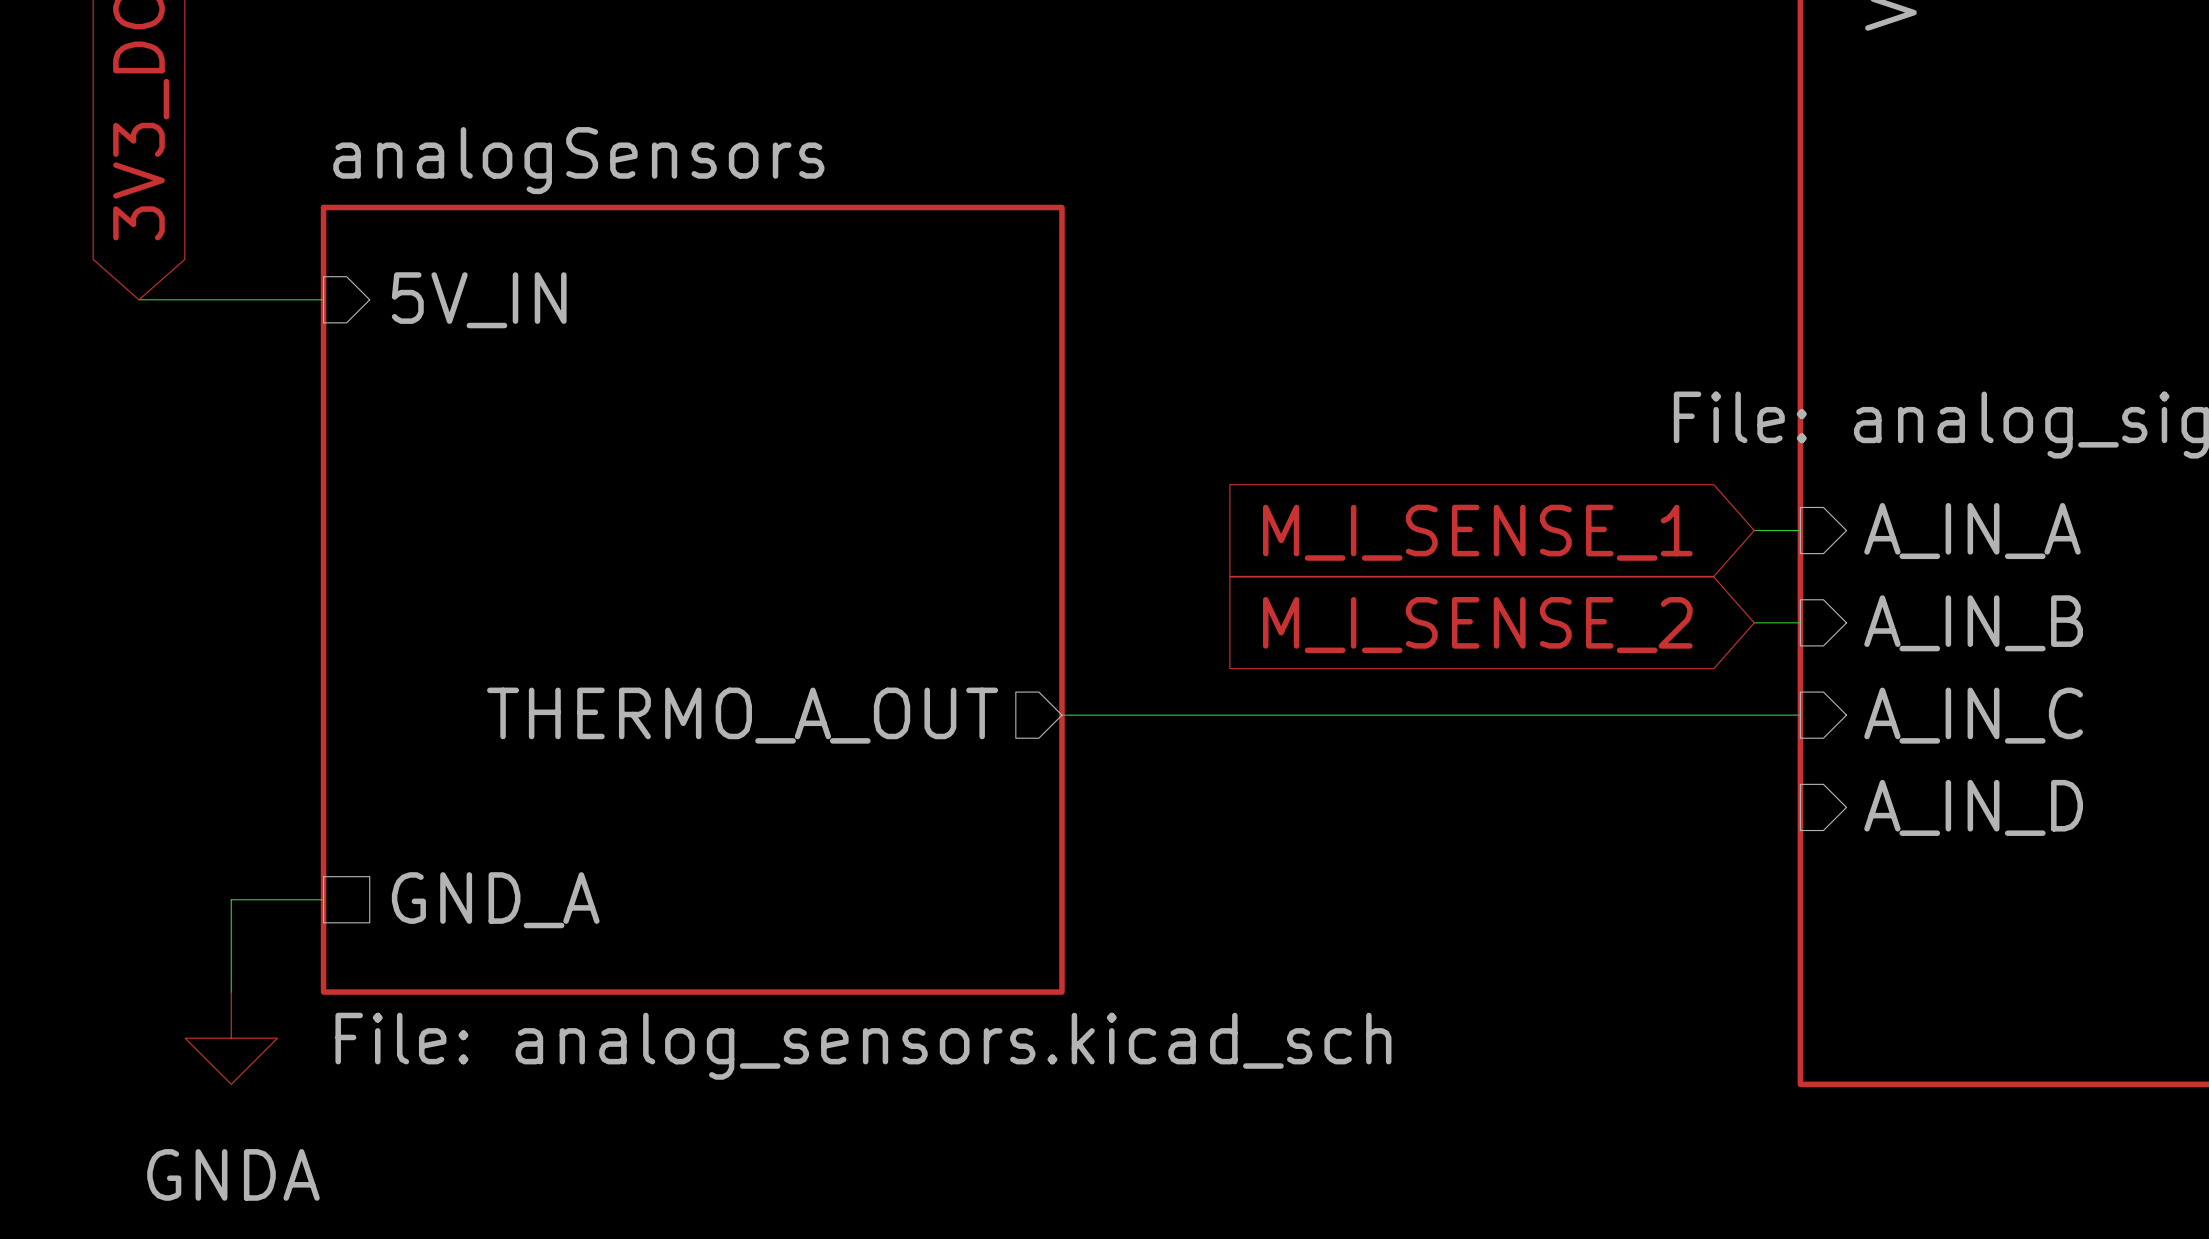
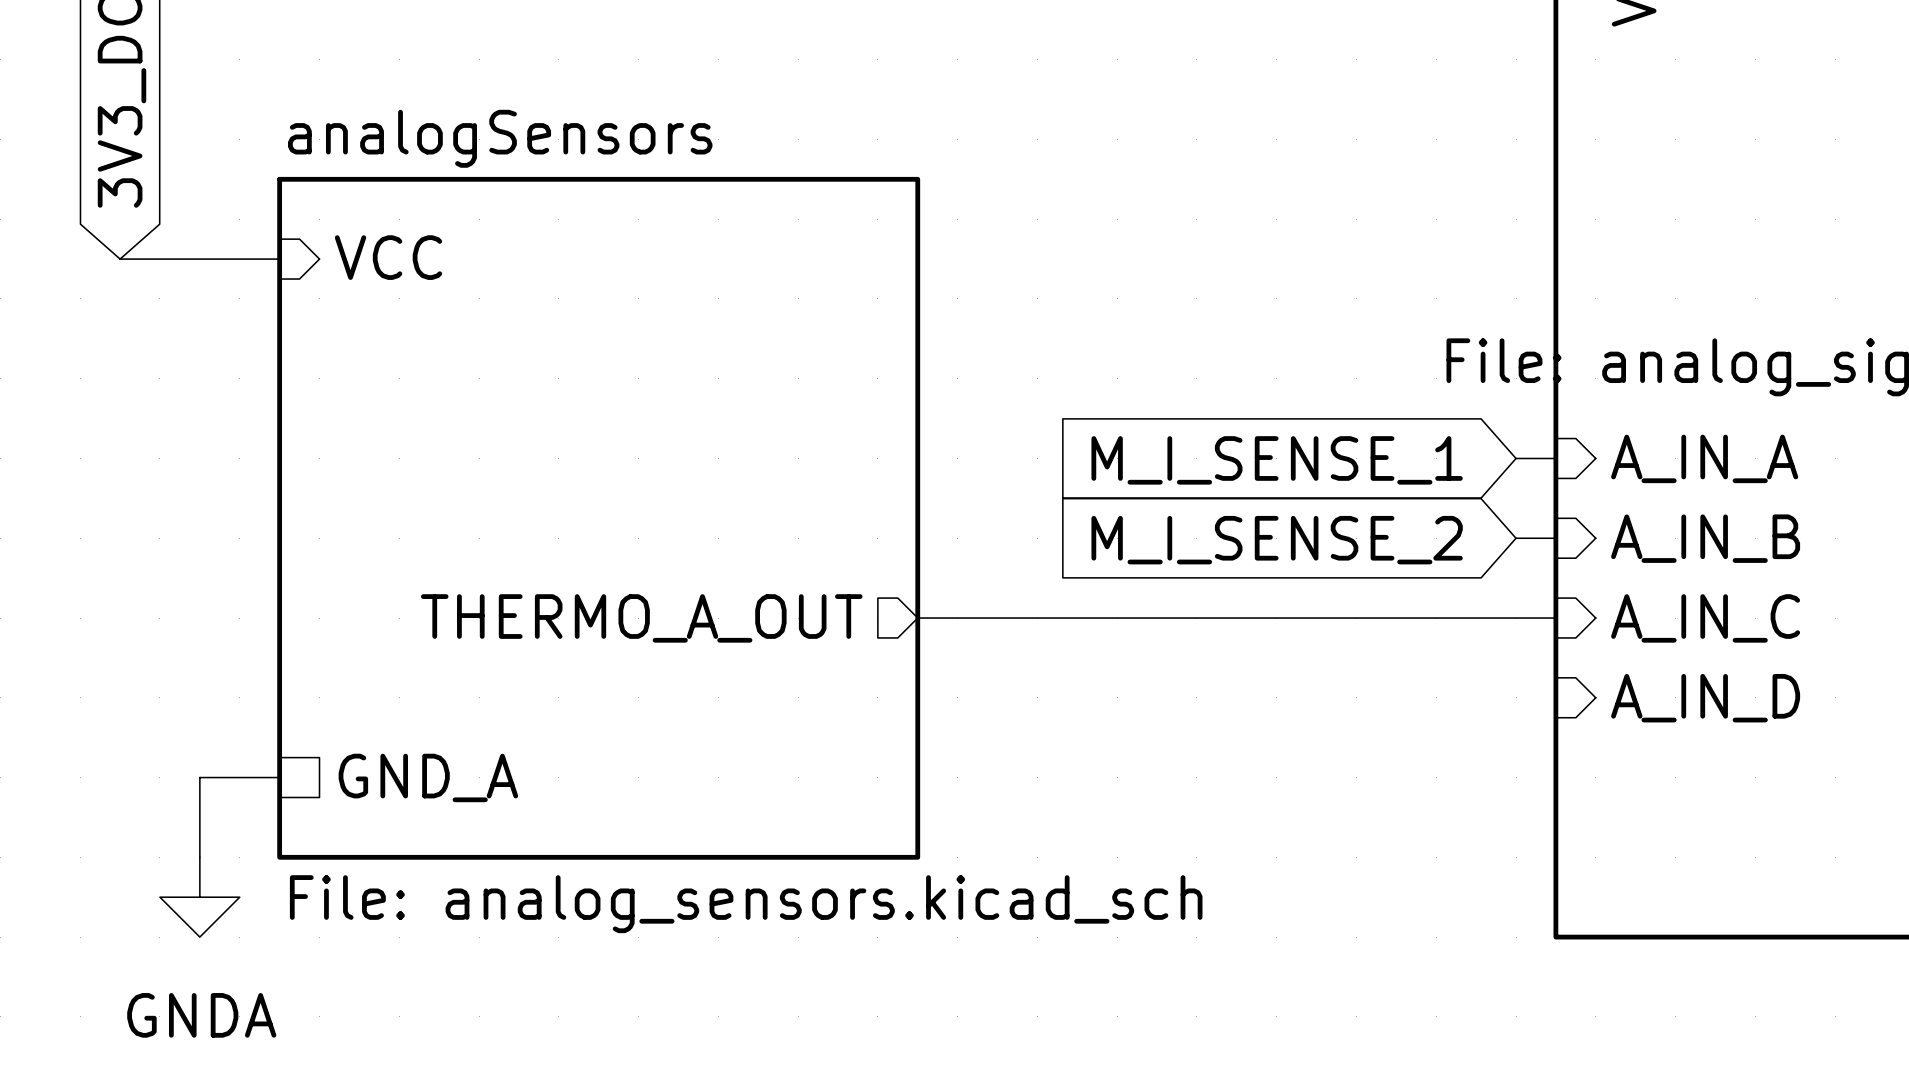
sheet pin: 5V_IN (479, 300) -> VCC (388, 257)

